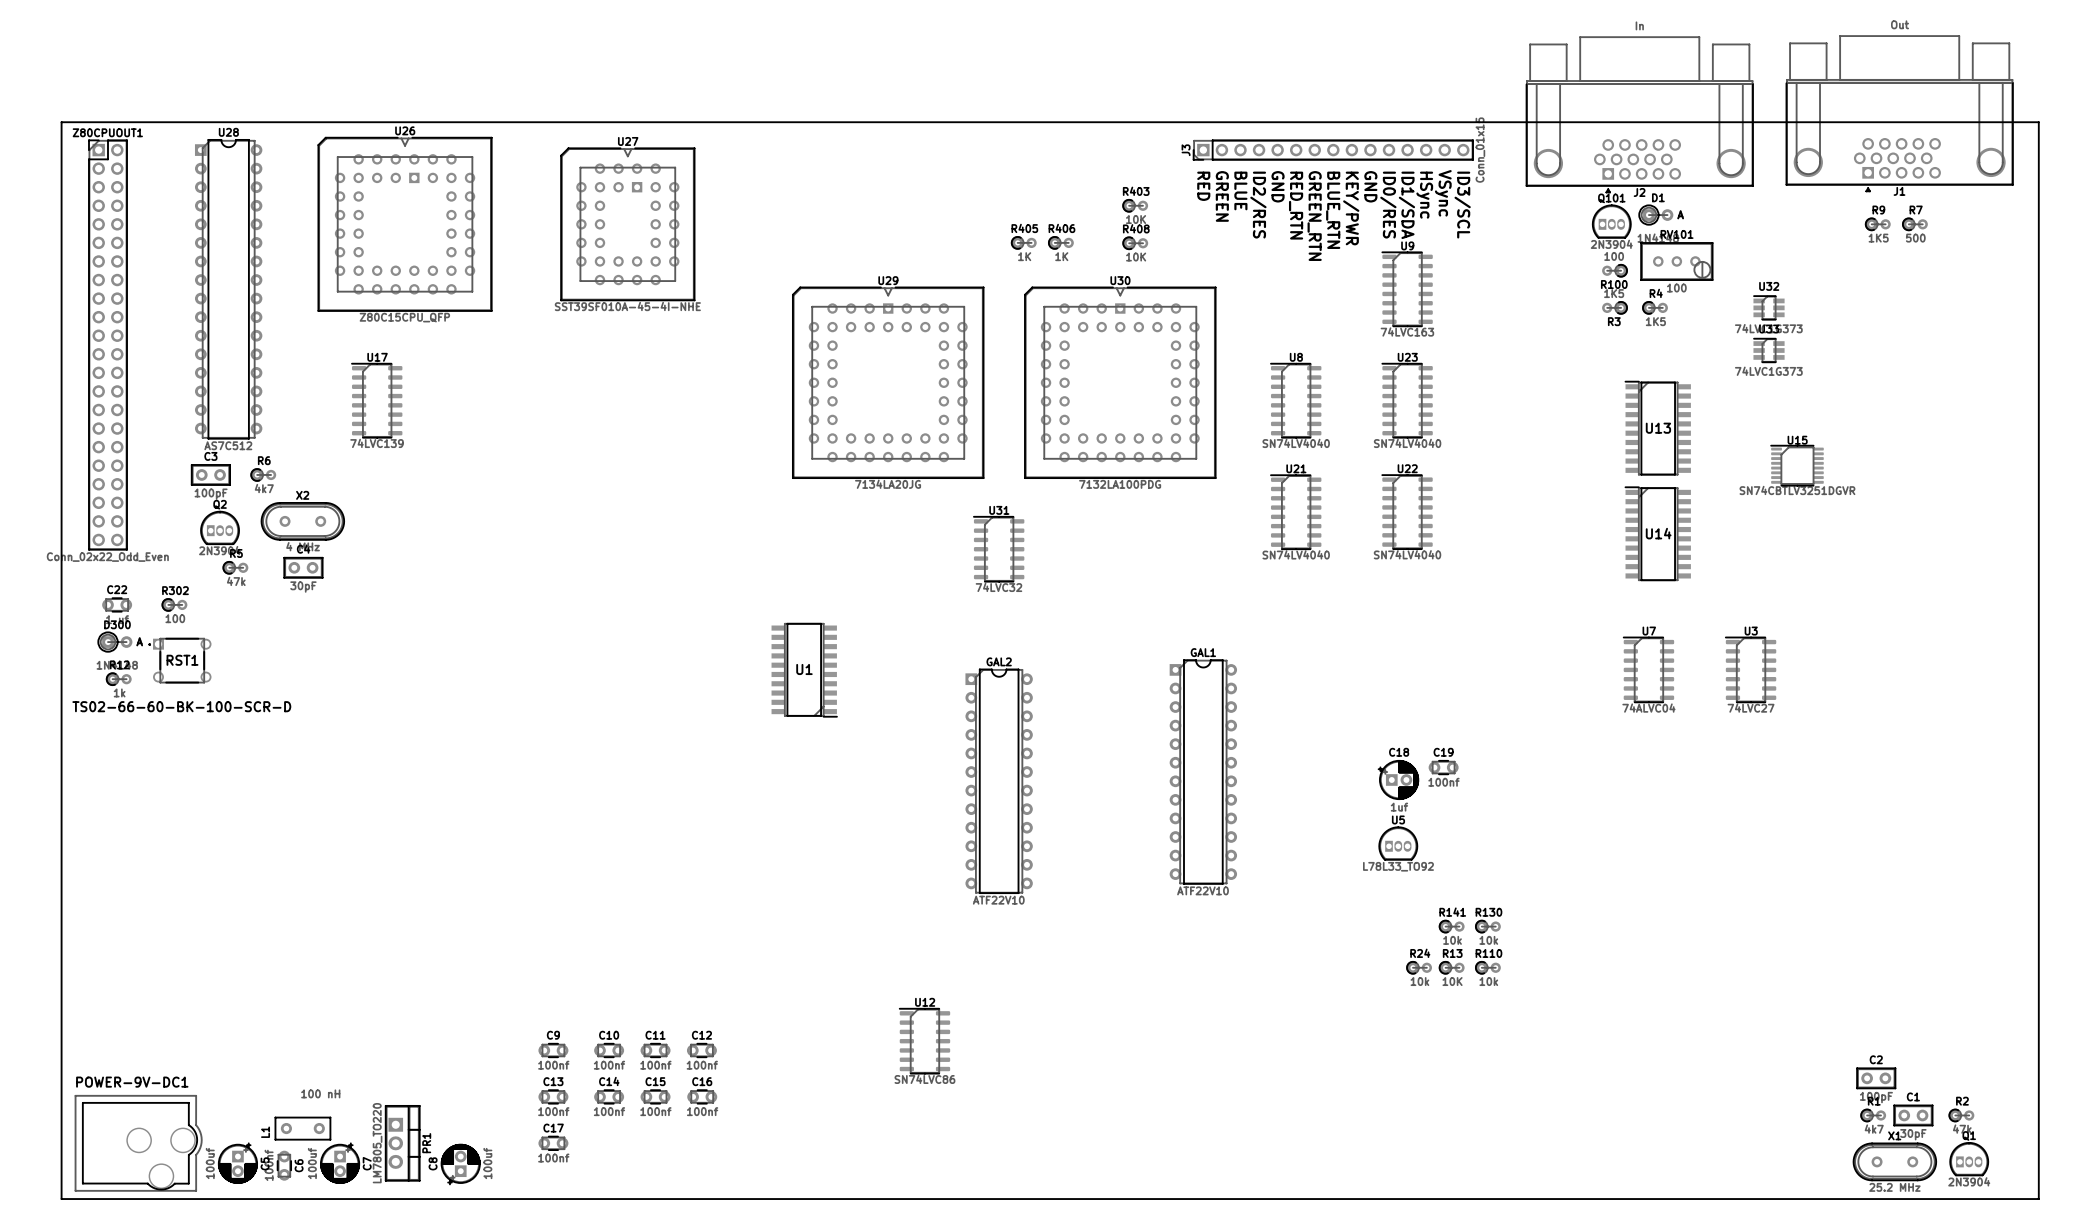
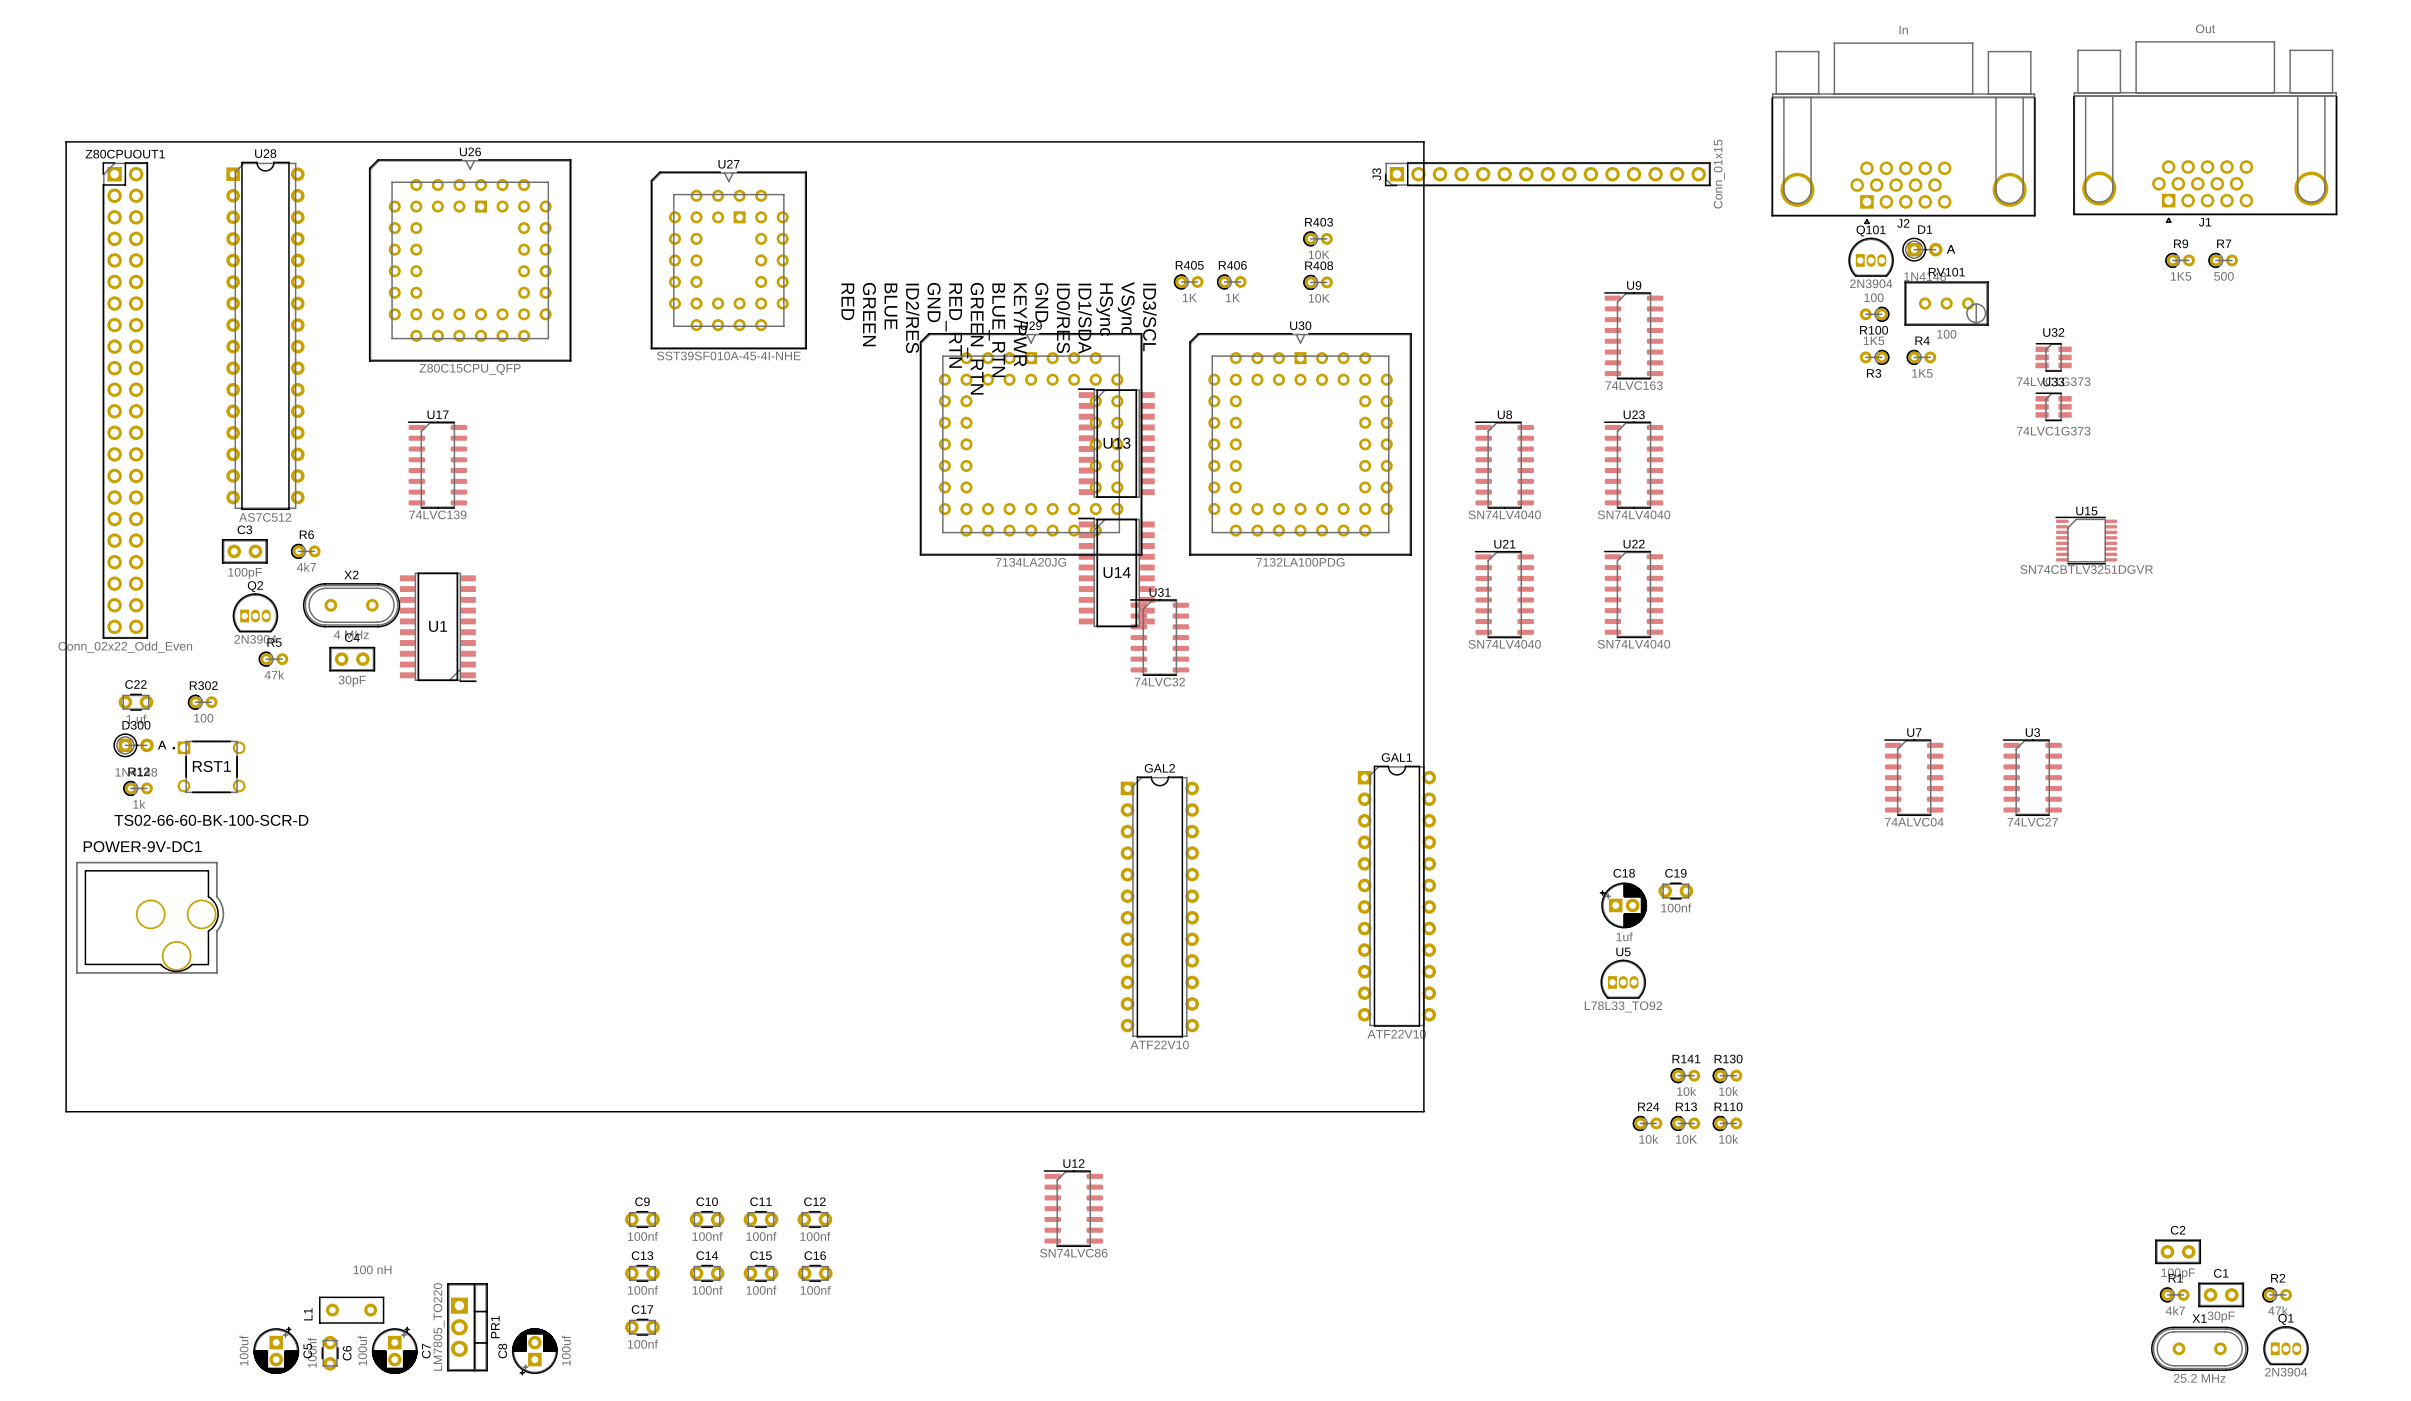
board edge: (61, 122) (61, 1199) (2038, 1199) (2038, 122) (1226, 122) -> (71, 141) (66, 141) (66, 1111) (1423, 1111) (1423, 141)
text: RED (1203, 186) -> none
text: GND (1278, 186) -> none
text: GND (1370, 186) -> none
text: BLUE (1240, 190) -> none
text: VSync (1443, 193) -> none
text: HSync (1424, 195) -> none
text: GREEN (1222, 196) -> none
text: ID2/RES (1258, 205) -> none
text: RED_RTN (1296, 205) -> none
text: ID0/RES (1388, 205) -> none
text: ID1/SDA (1406, 205) -> none
text: ID3/SCL (1462, 205) -> none
text: KEY/PWR (1351, 208) -> none
text: BLUE_RTN (1333, 210) -> none
text: GREEN_RTN (1314, 216) -> none
text: none -> RED (847, 301)
text: none -> GND (934, 302)
text: none -> GND (1041, 302)
text: none -> BLUE (890, 306)
text: none -> VSync (1126, 308)
text: none -> HSync (1104, 309)
text: none -> GREEN (869, 314)
text: none -> ID2/RES (912, 318)
text: none -> RED_RTN (953, 325)
text: none -> ID0/RES (1063, 318)
text: none -> ID1/SDA (1085, 318)
text: none -> ID3/SCL (1149, 317)
text: none -> KEY/PWR (1020, 324)
text: none -> BLUE_RTN (996, 330)
text: none -> GREEN_RTN (975, 338)
U13 position: (1657, 428) -> (1116, 443)
U14 position: (1657, 533) -> (1116, 572)
U1 position: (804, 670) -> (438, 627)
POWER-9V-DC1 position: (138, 1143) -> (150, 917)

